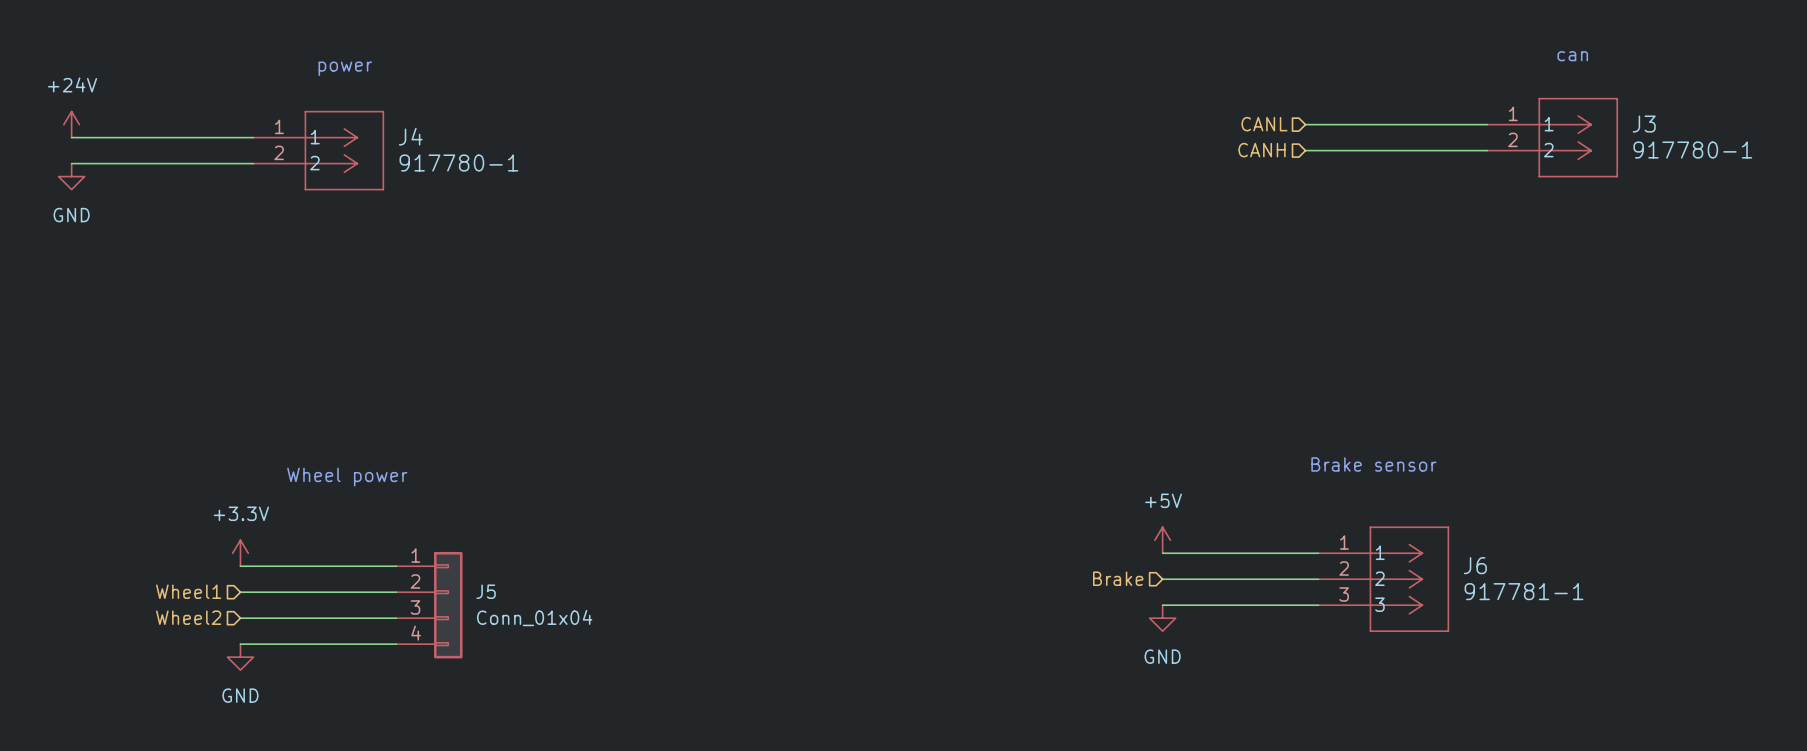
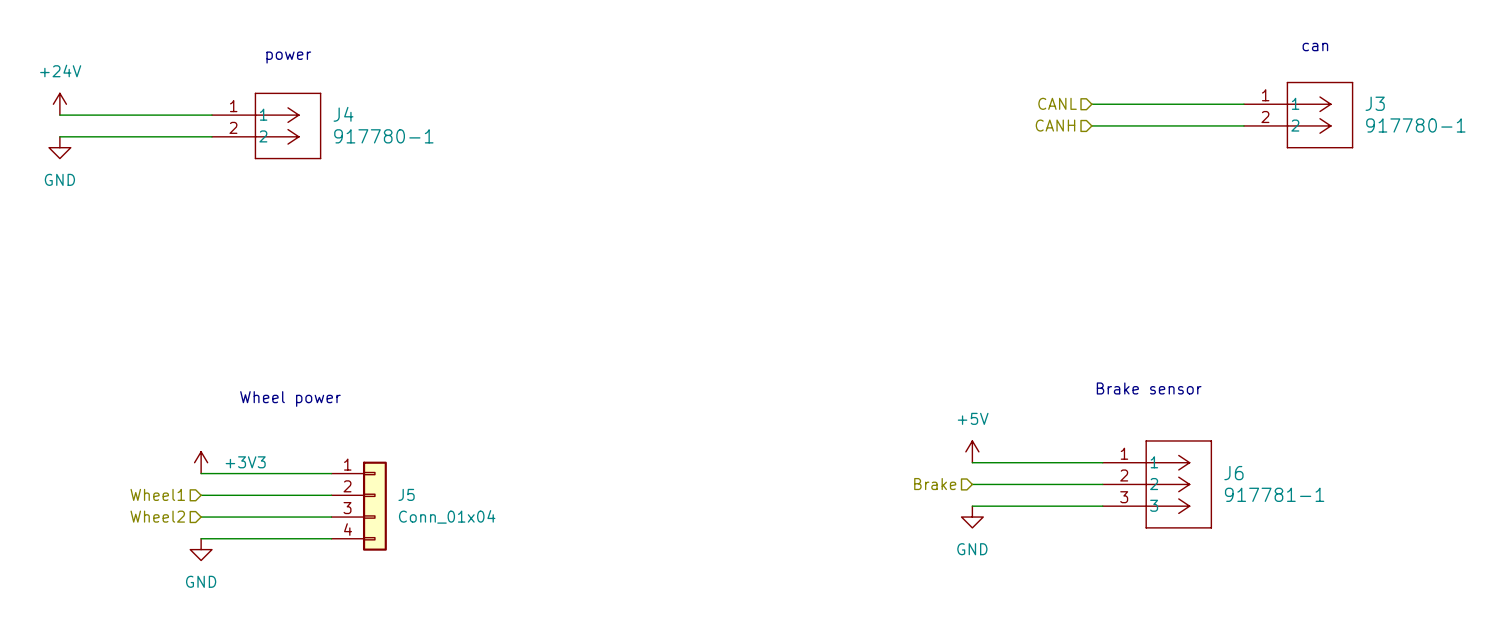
power symbol: +3.3V (240, 553) -> +3V3 (201, 462)

